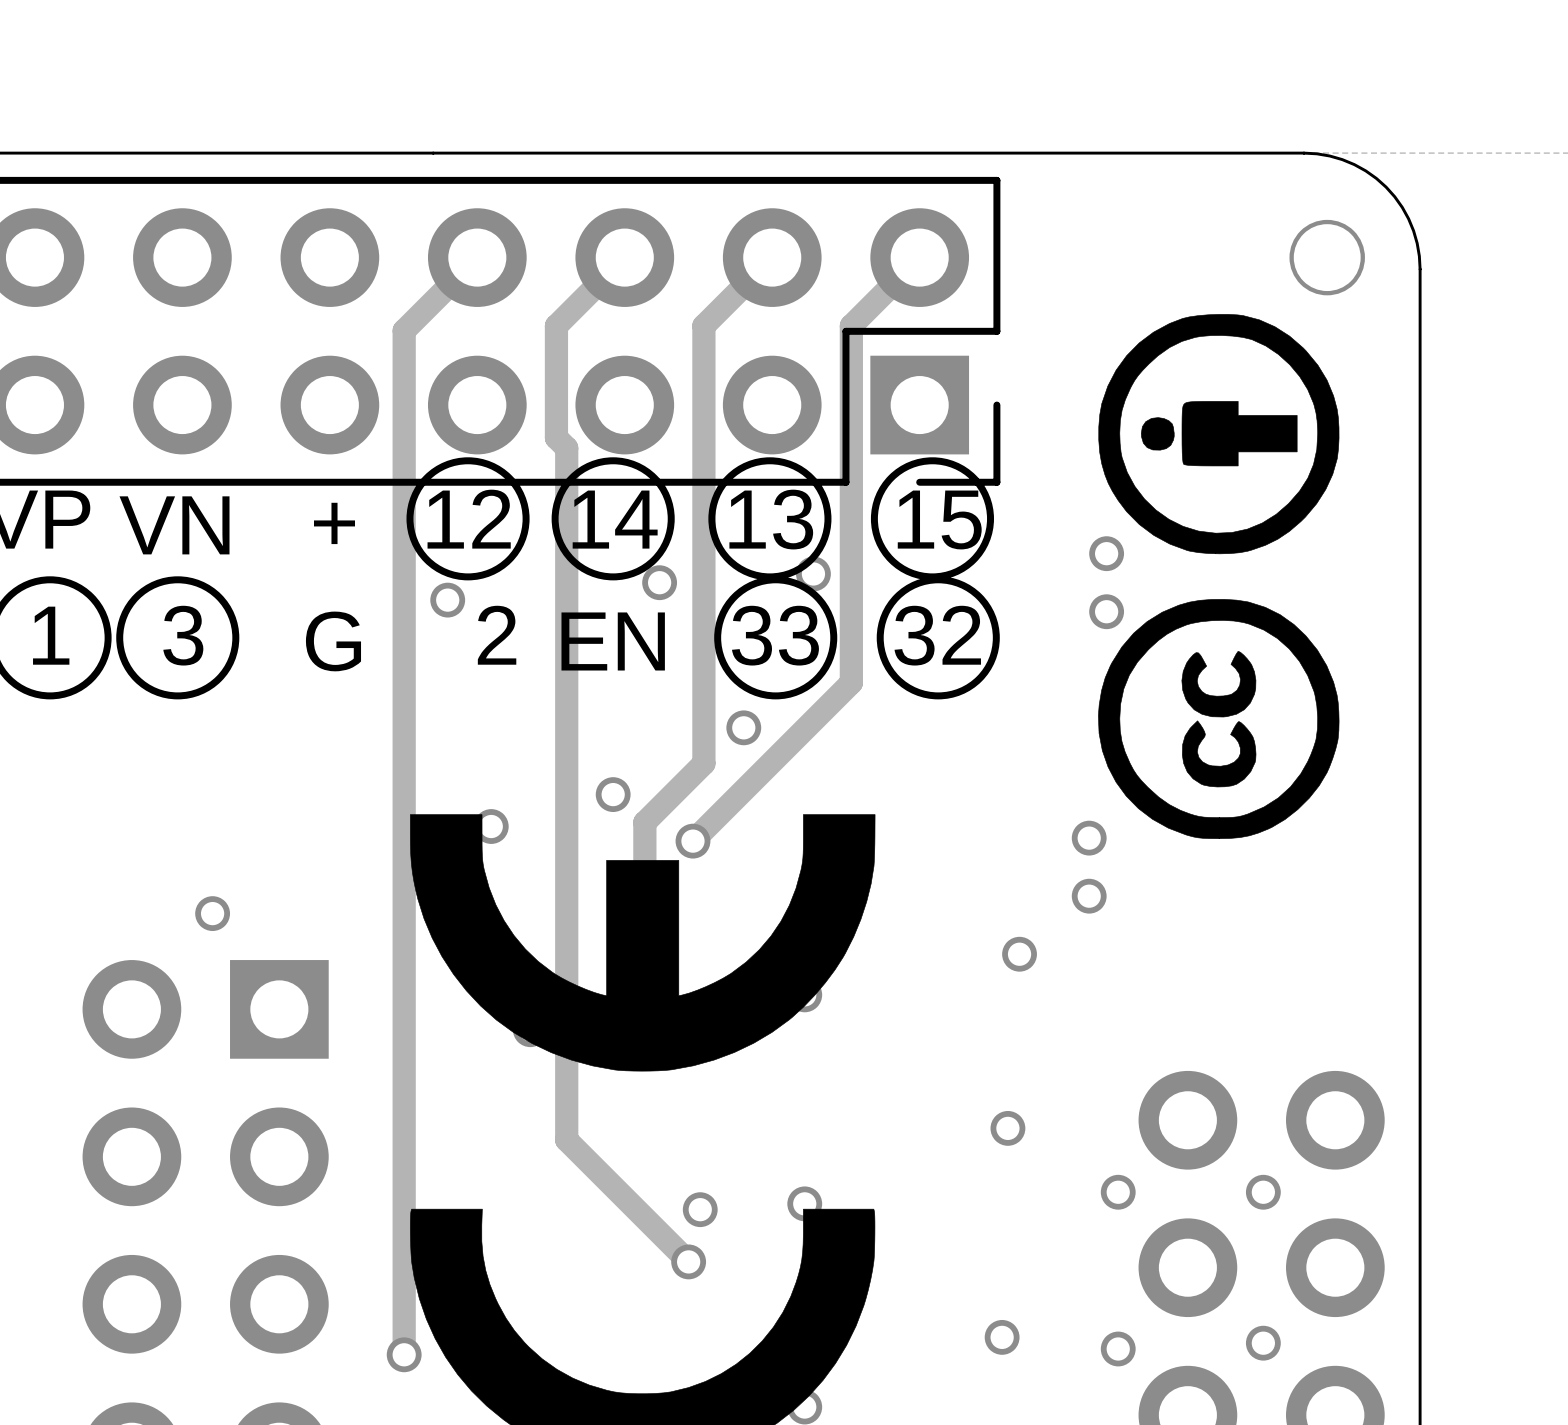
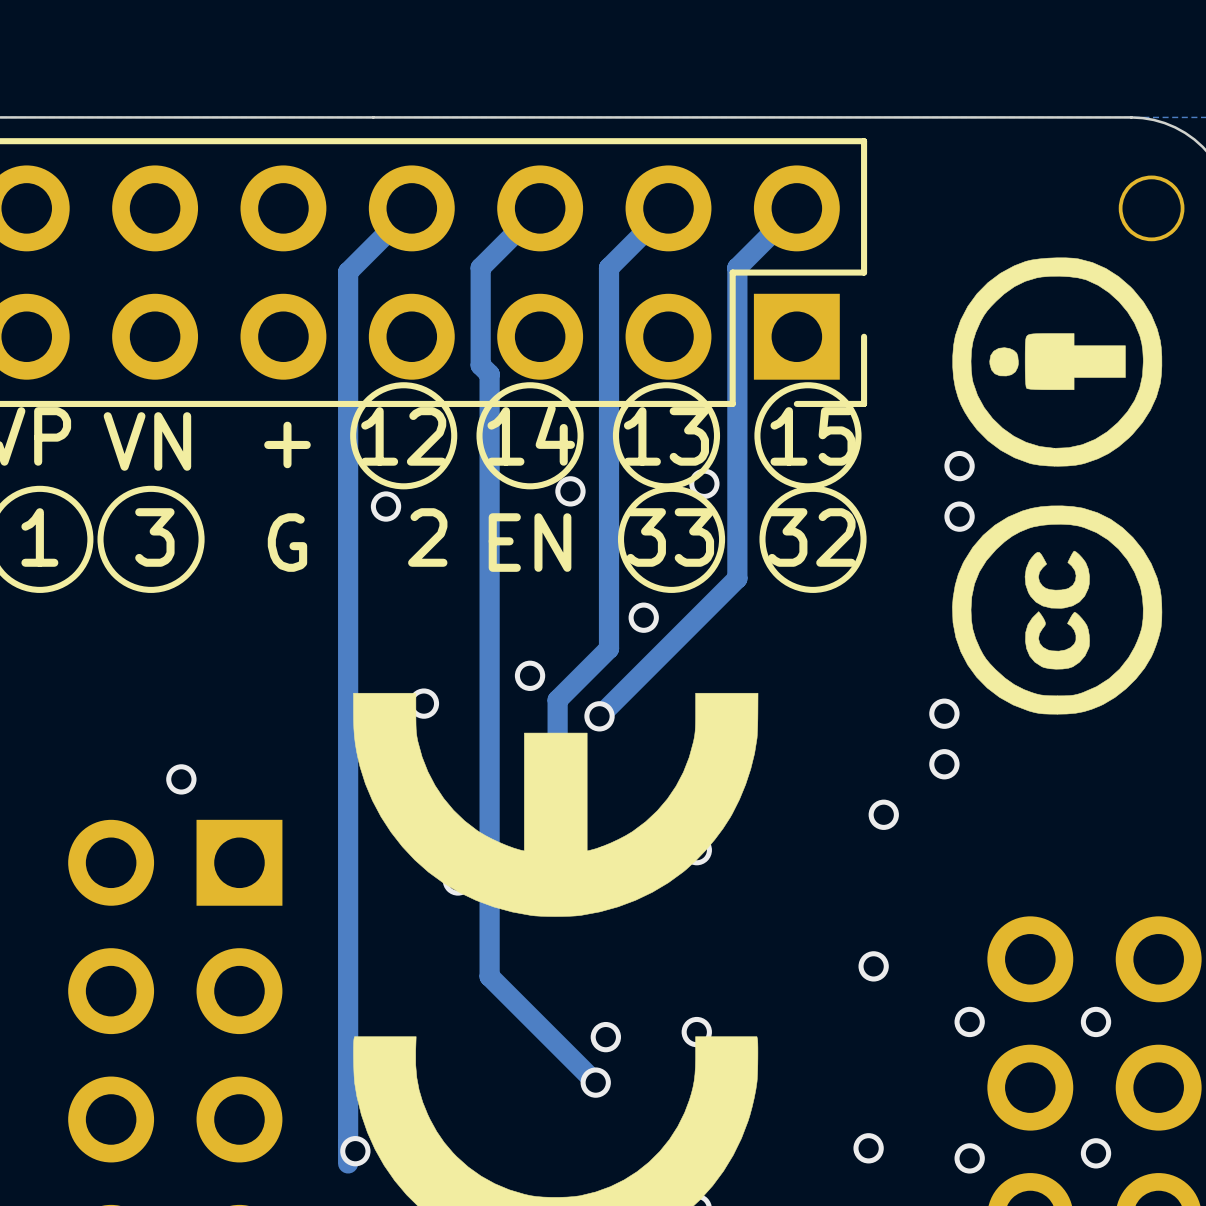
via position: (404, 1354) -> (355, 1151)

